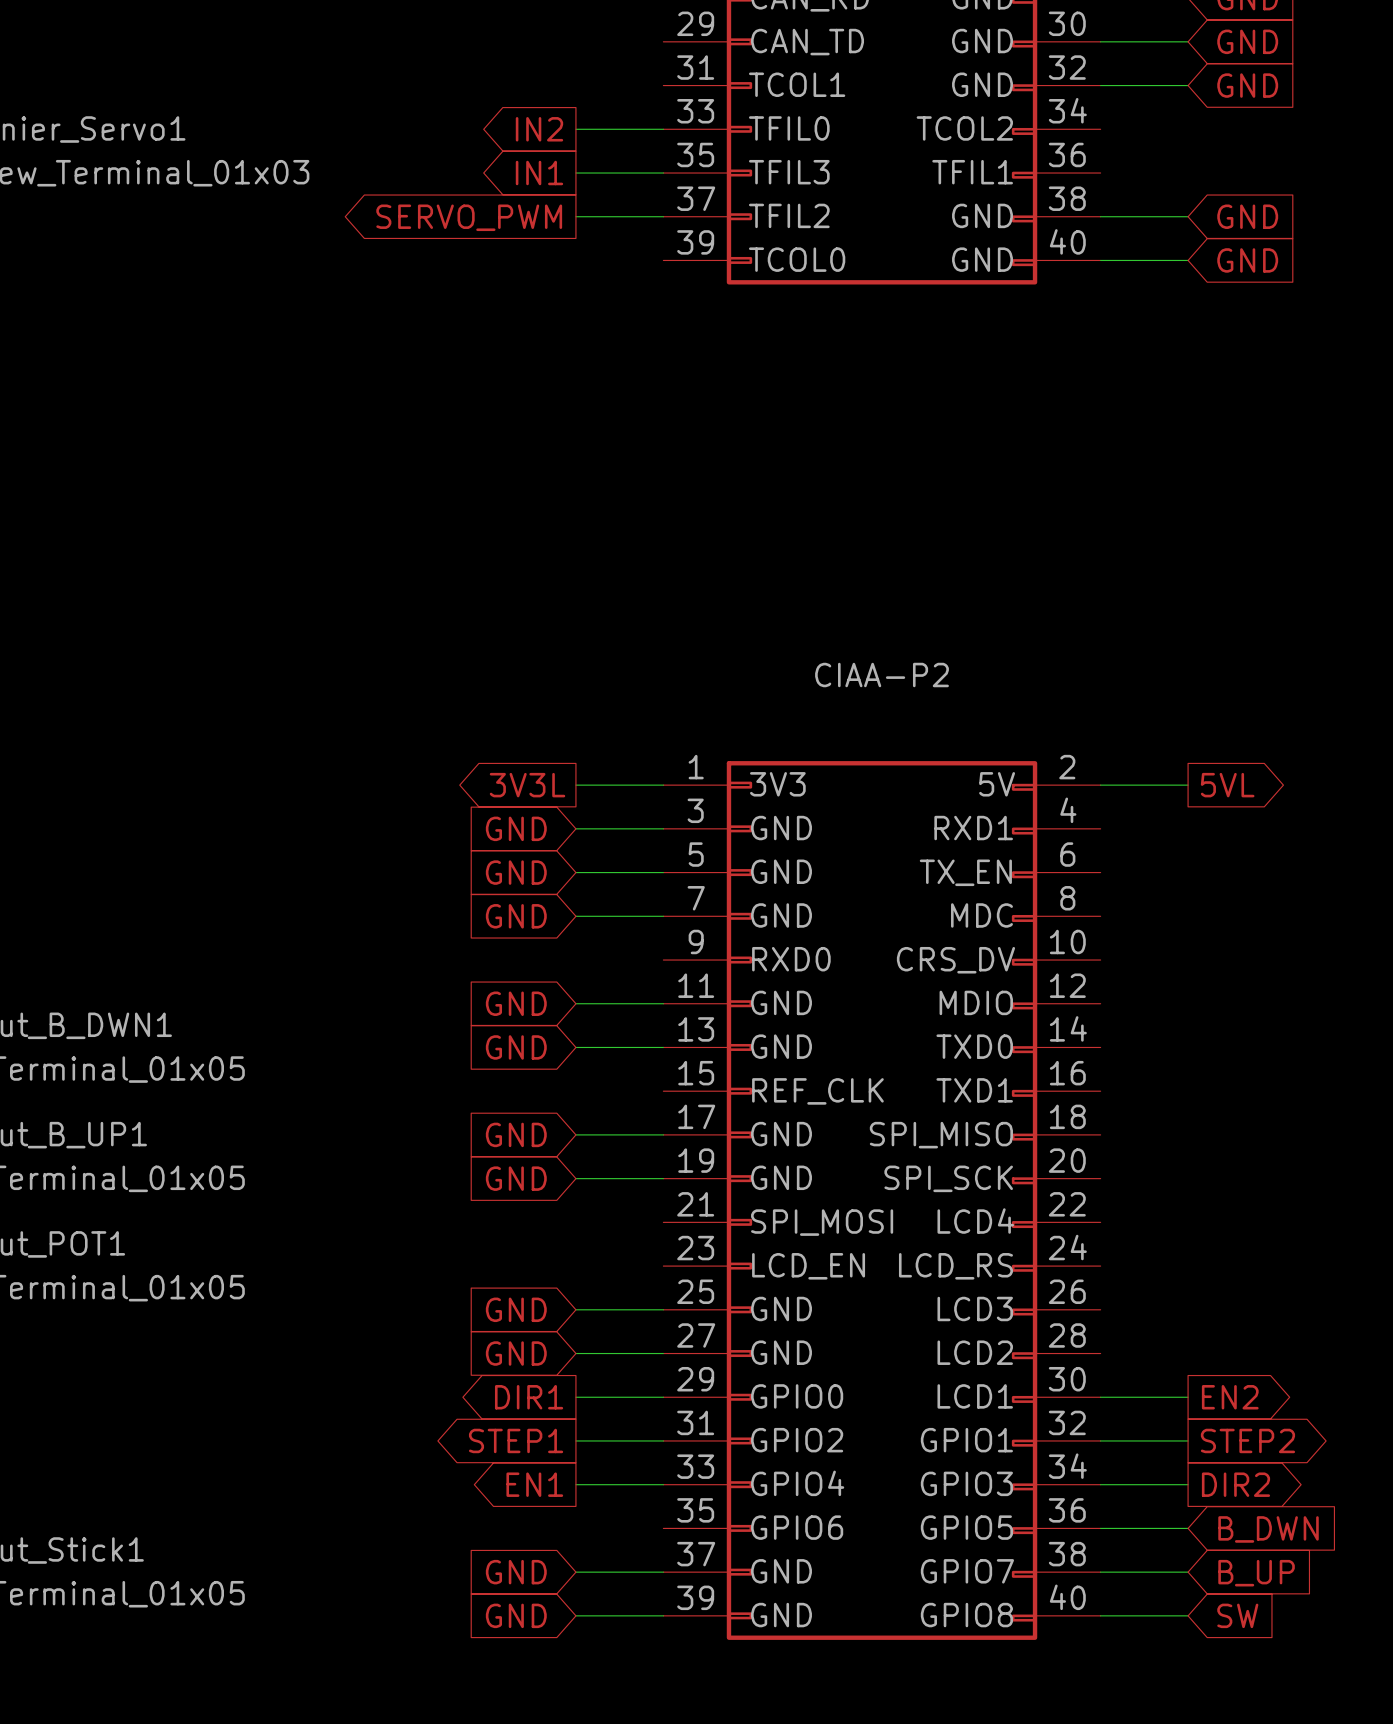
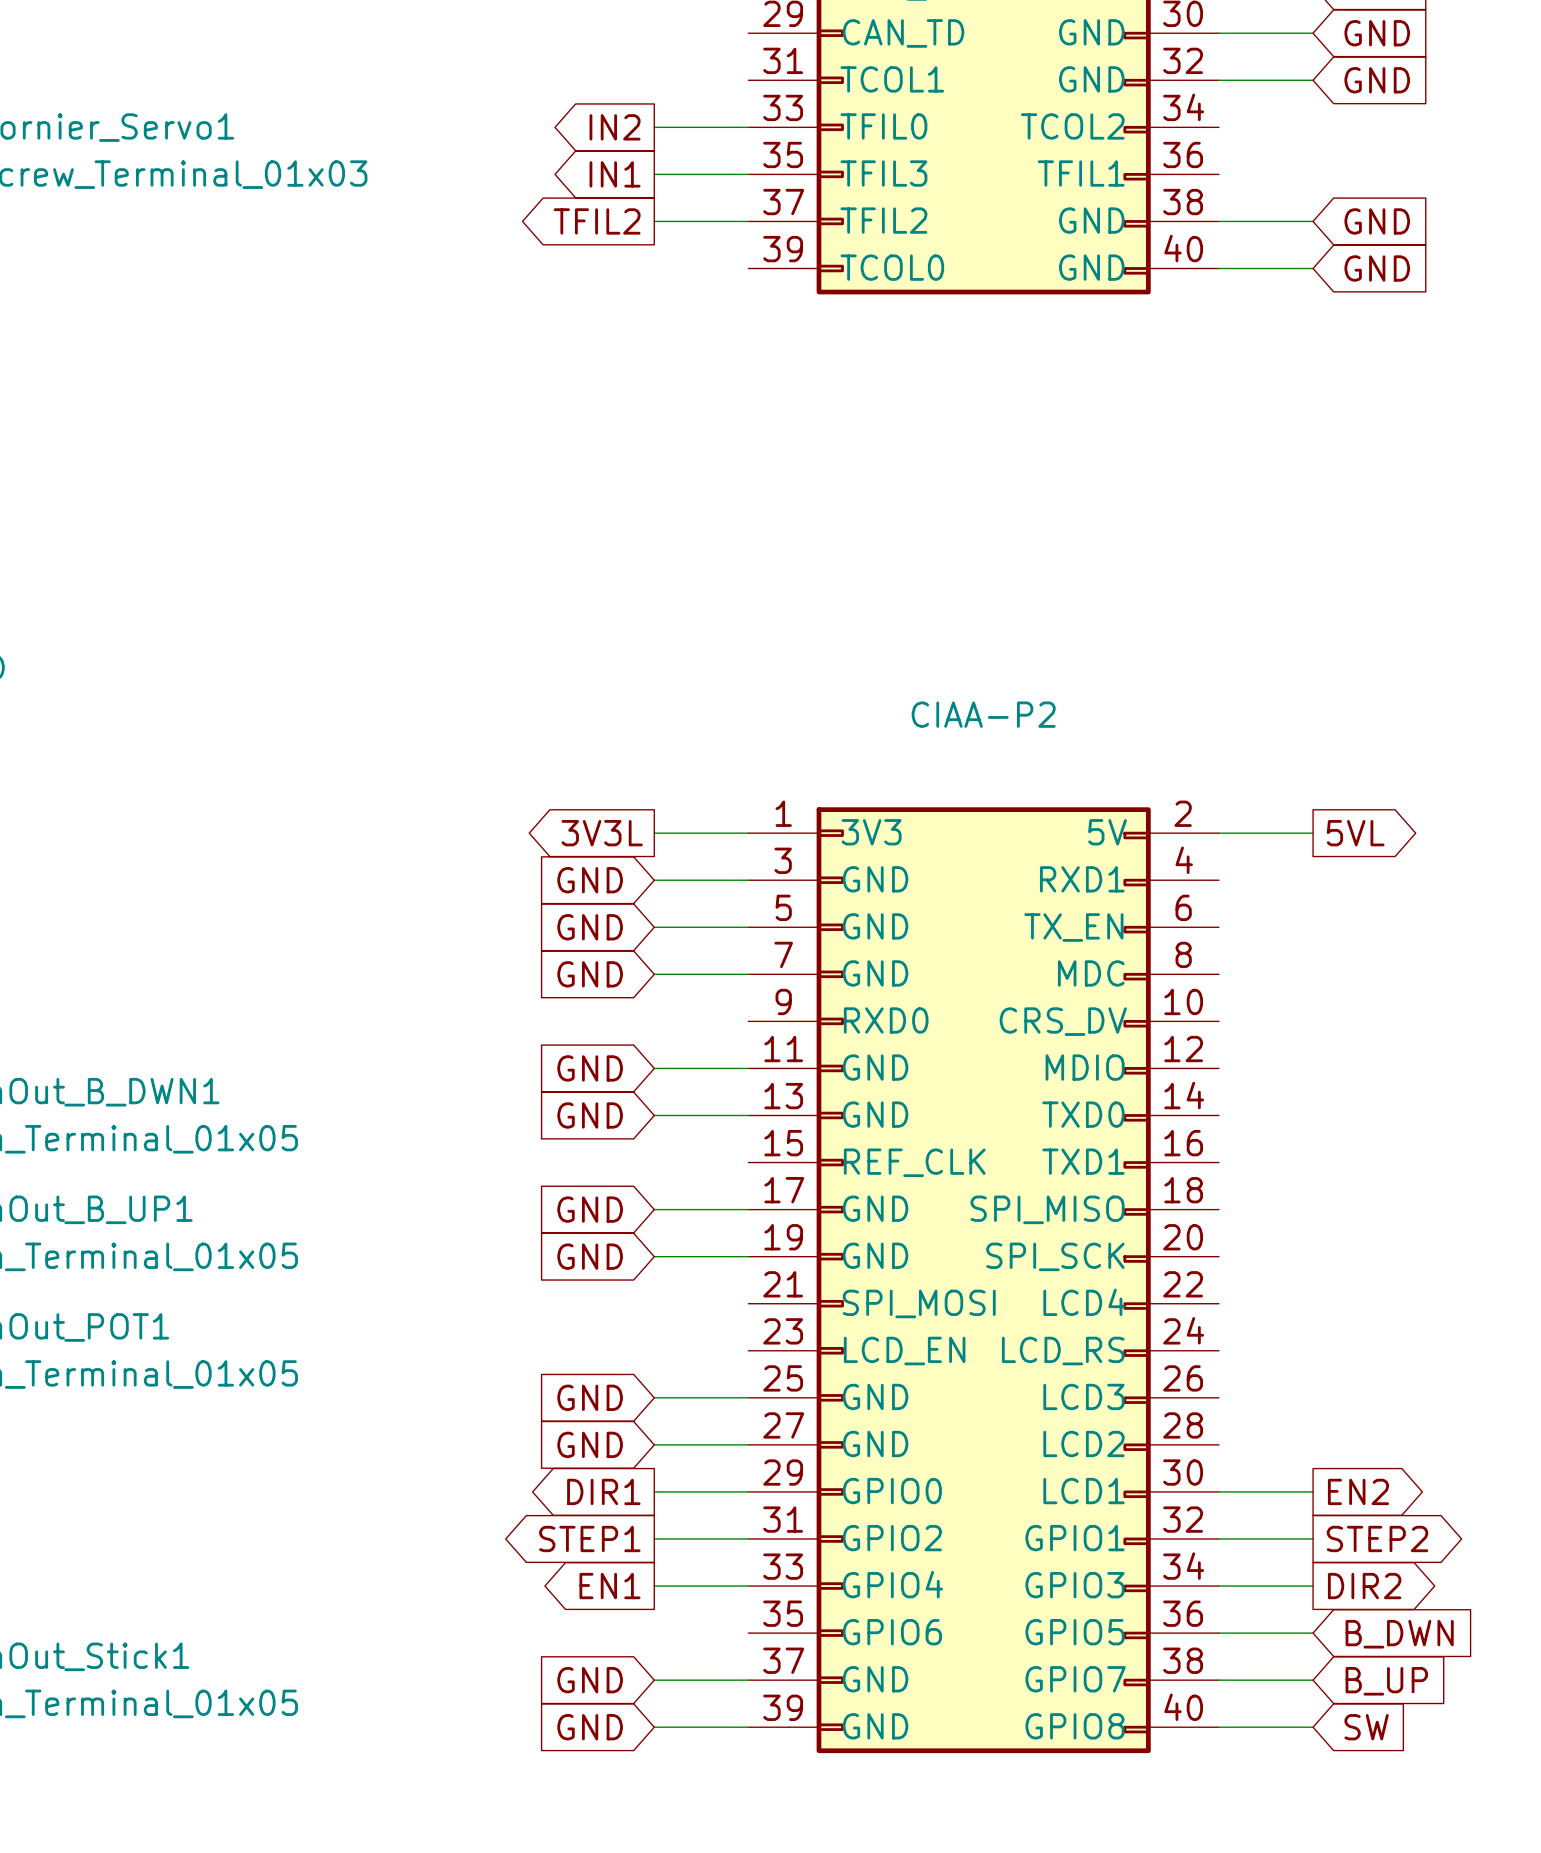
global label: SERVO_PWM (469, 217) -> TFIL2 (597, 221)

